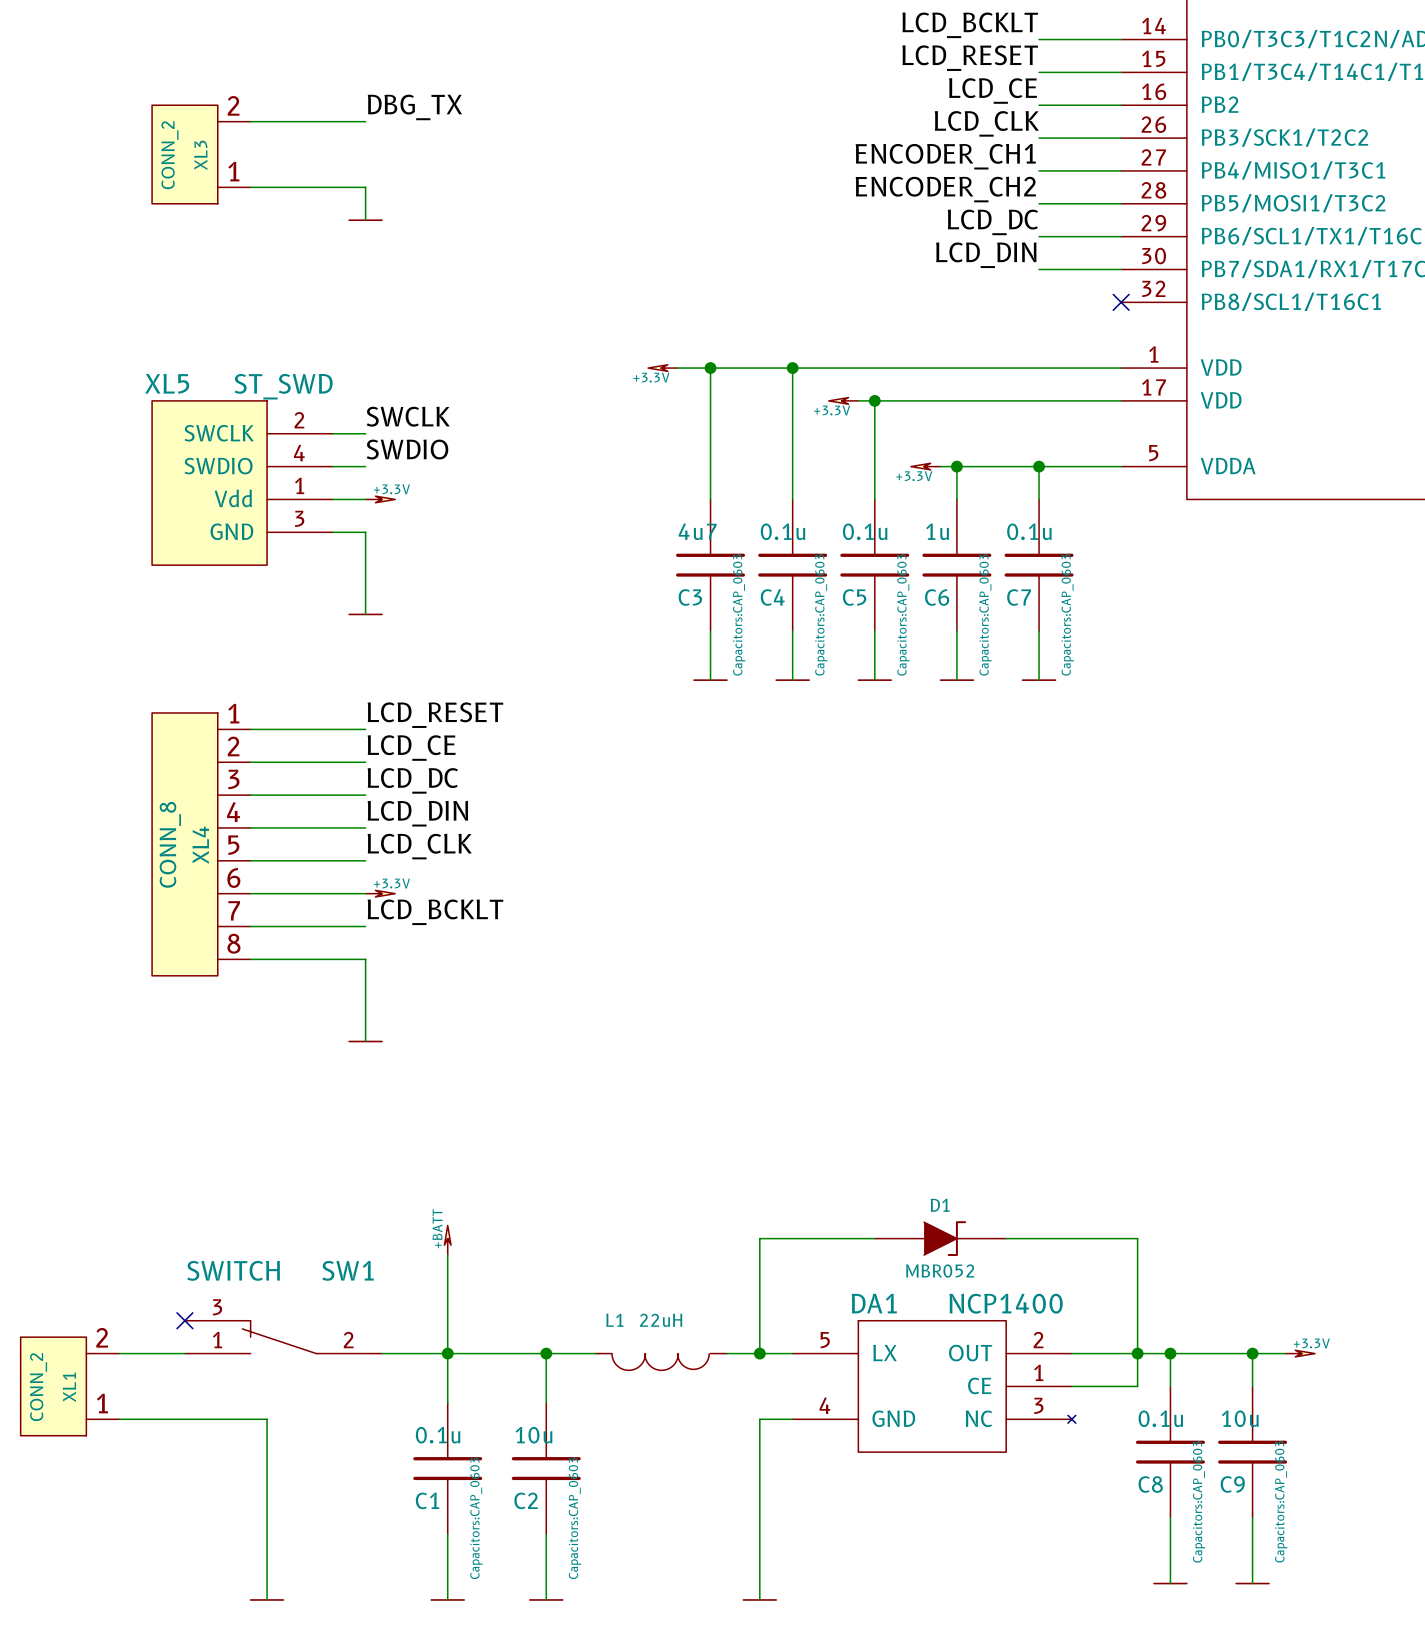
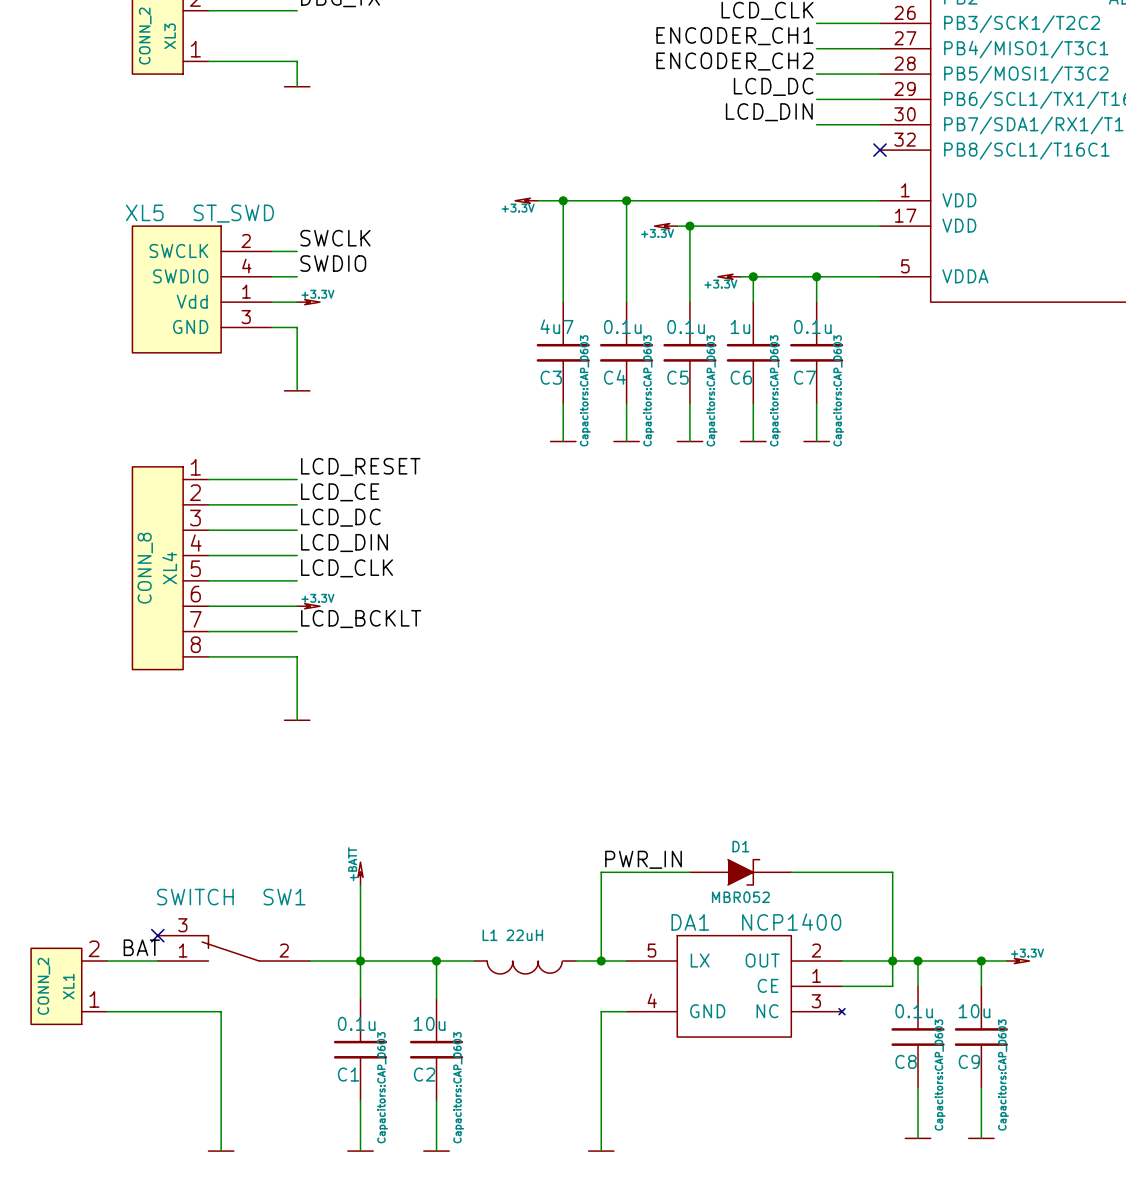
label: none -> PWR_IN (643, 859)
label: none -> BAT (141, 947)

